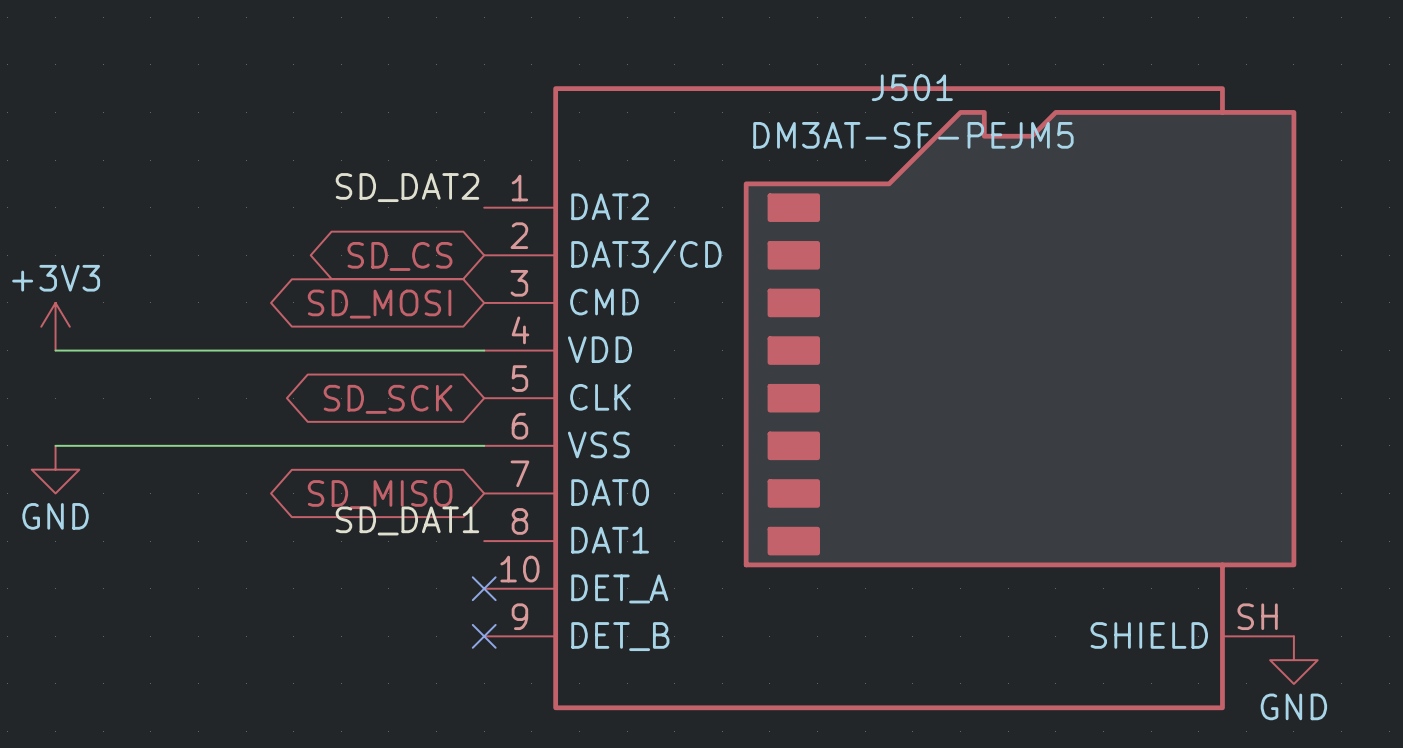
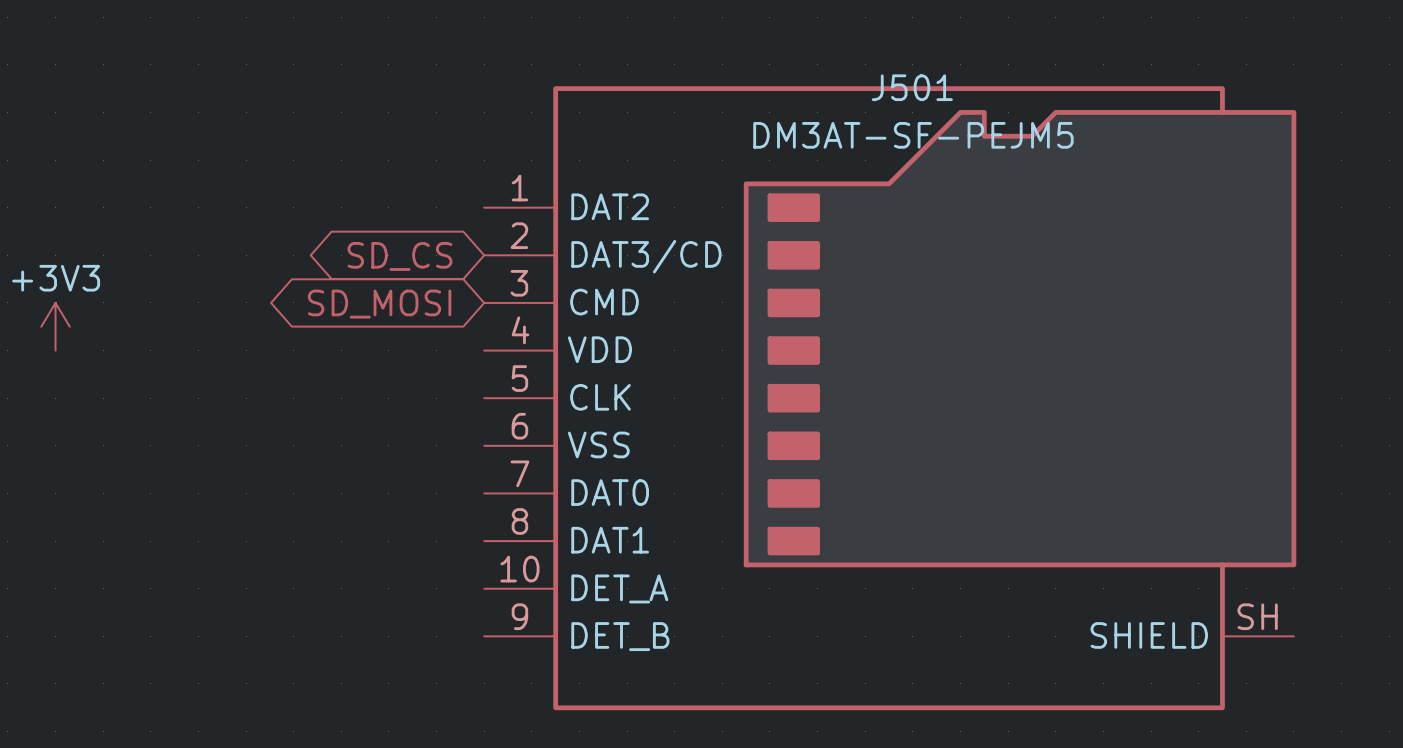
label: SD_DAT2 (407, 187) -> none
wire: (55, 350) (484, 350) -> none
global label: SD_SCK (388, 399) -> none
wire: (55, 445) (484, 445) -> none
power symbol: GND (55, 469) -> none
global label: SD_MISO (380, 494) -> none
label: SD_DAT1 (407, 520) -> none
no-connect mark: (484, 588) -> none
no-connect mark: (484, 636) -> none
power symbol: GND (1293, 660) -> none

